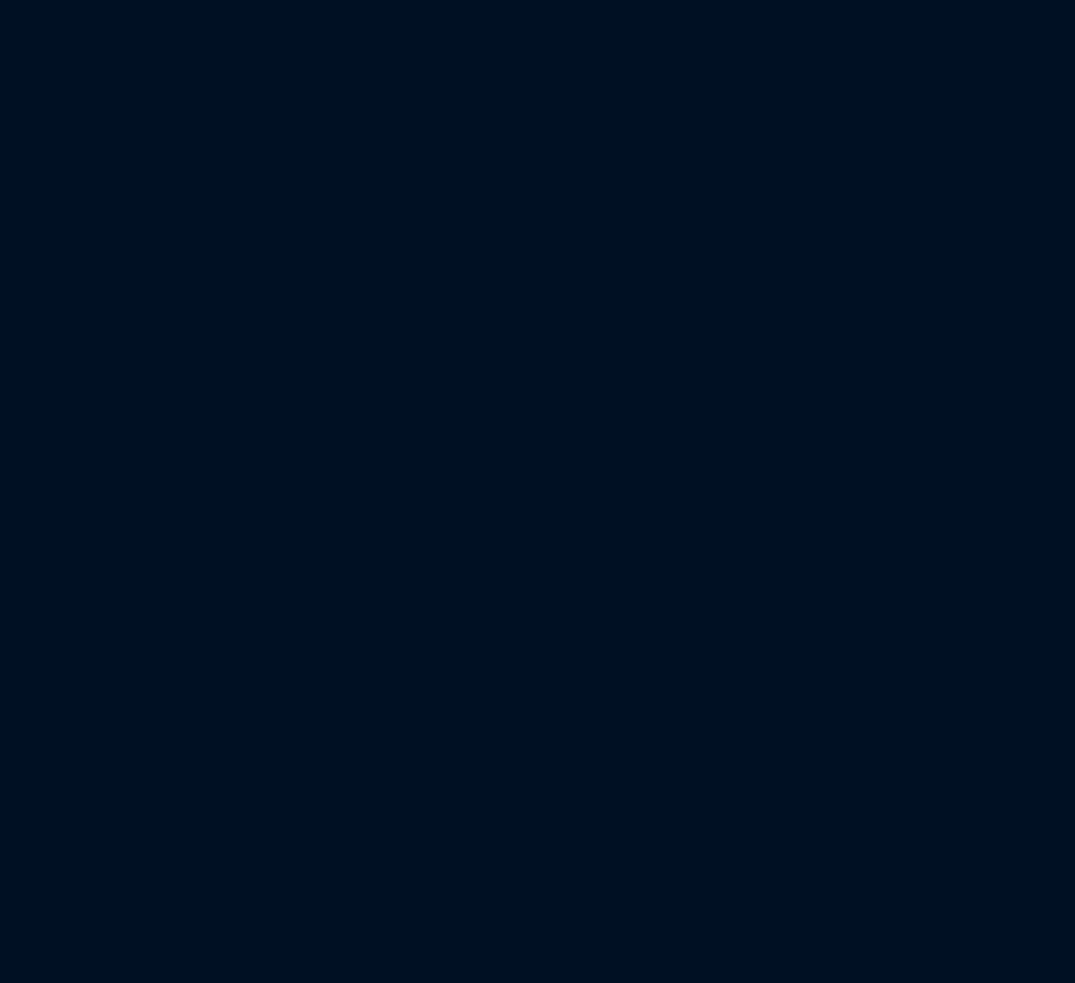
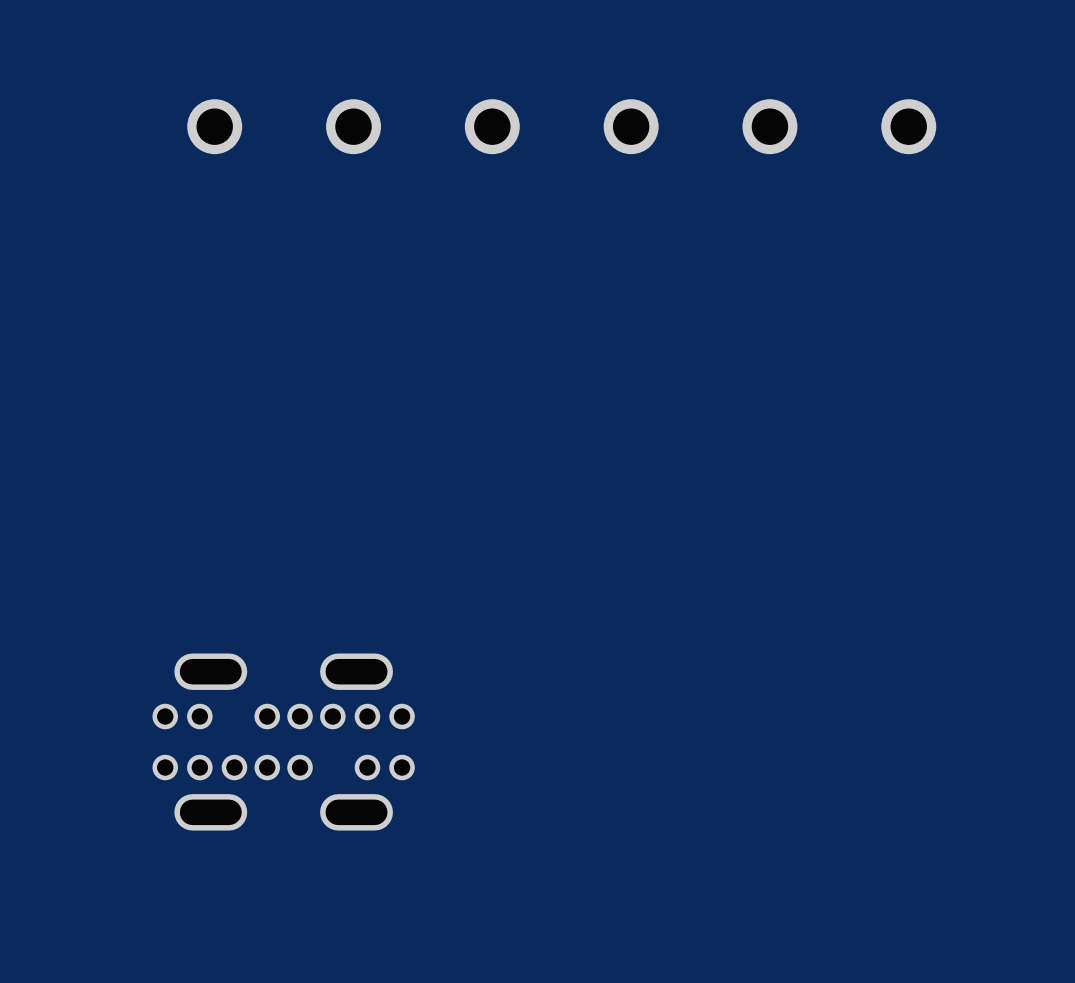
part: none -> (561, 126)
part: none -> (283, 742)

